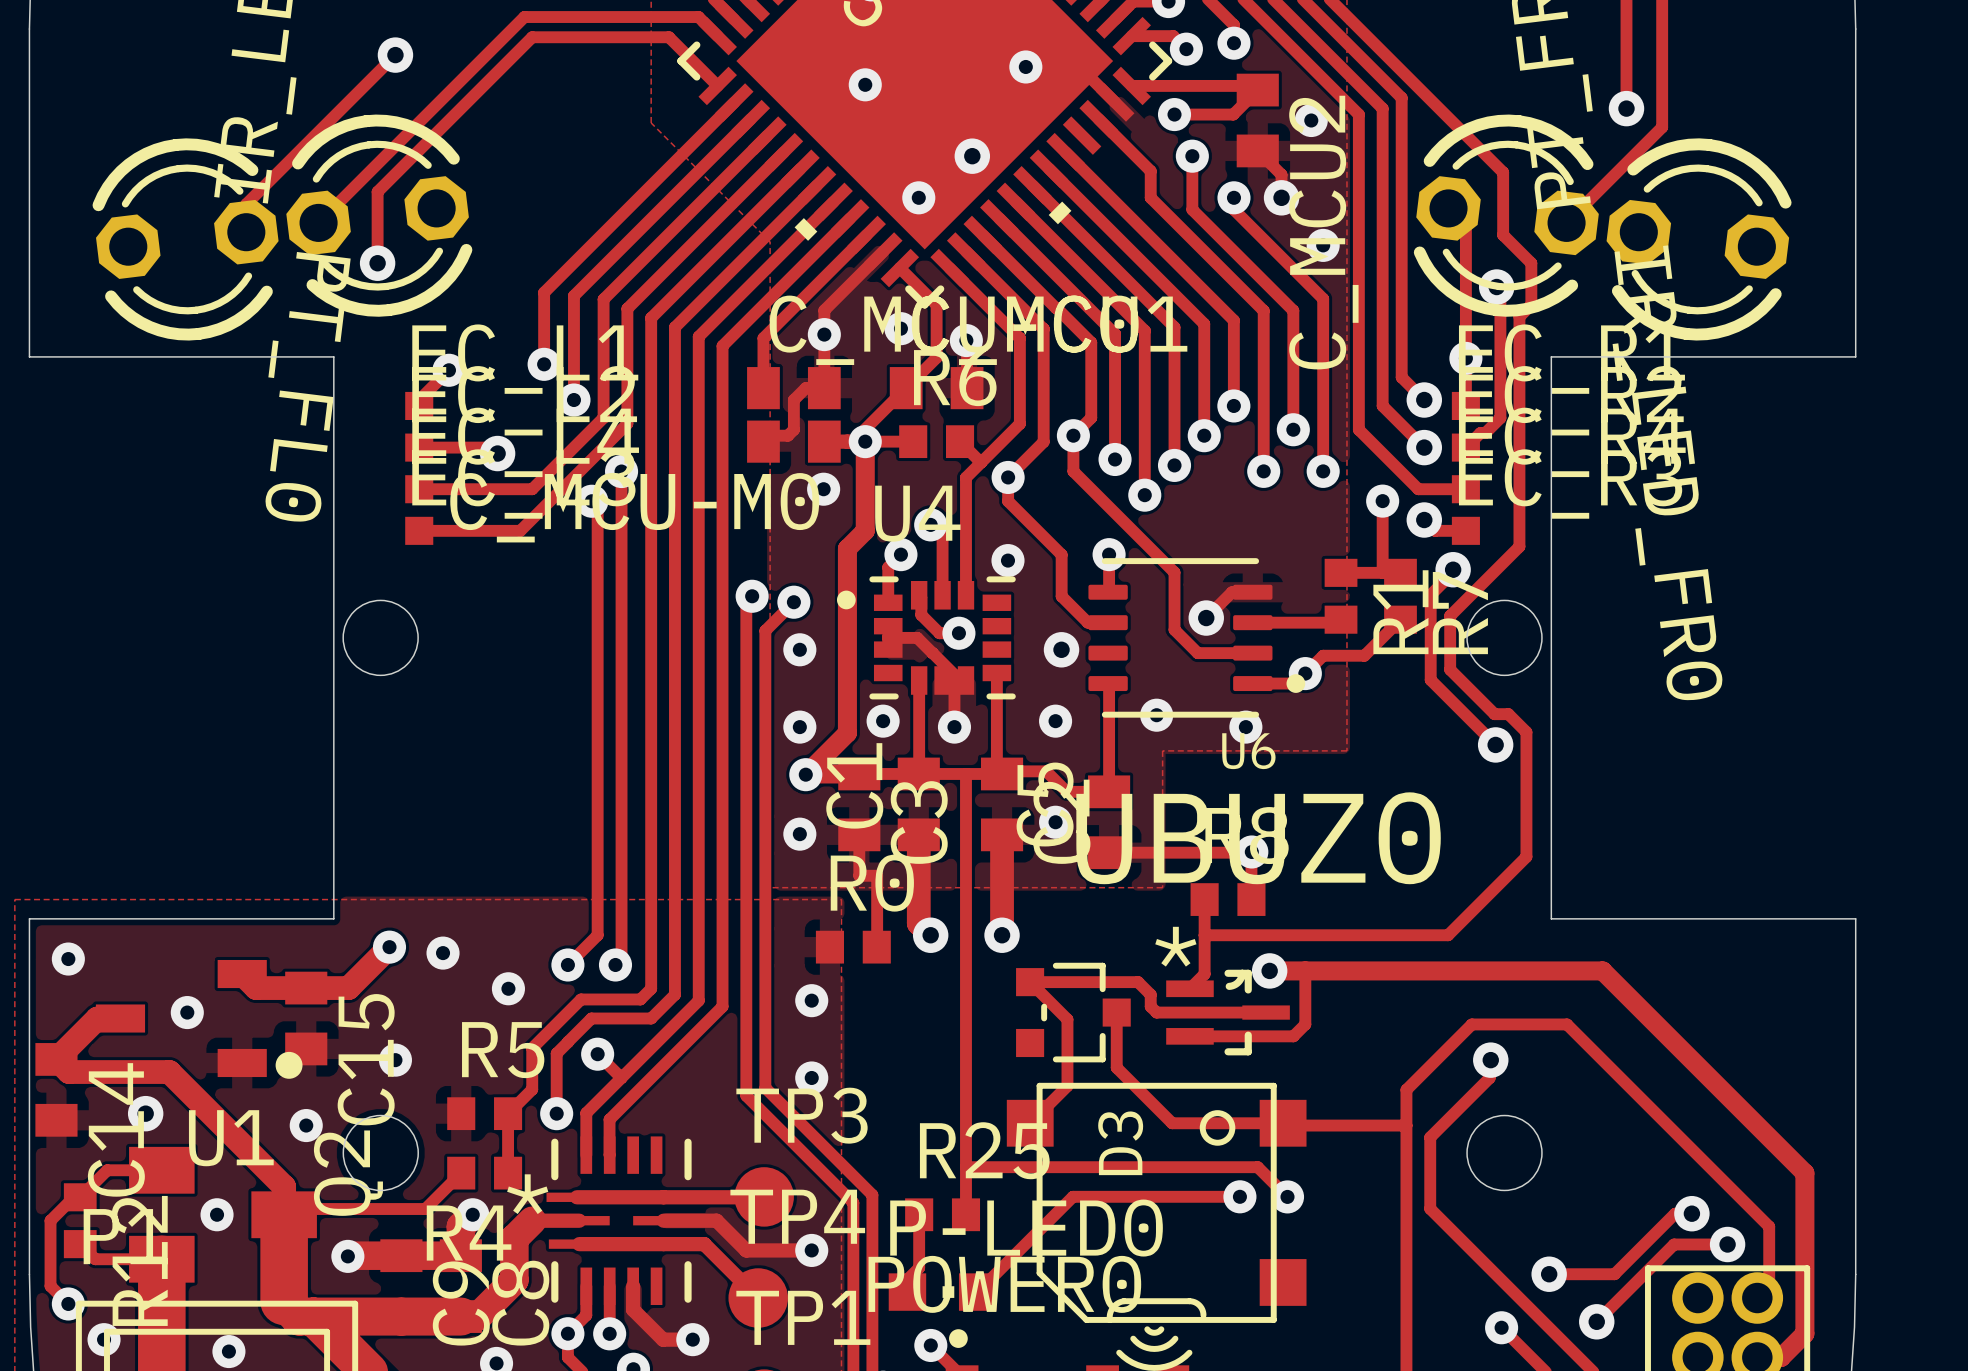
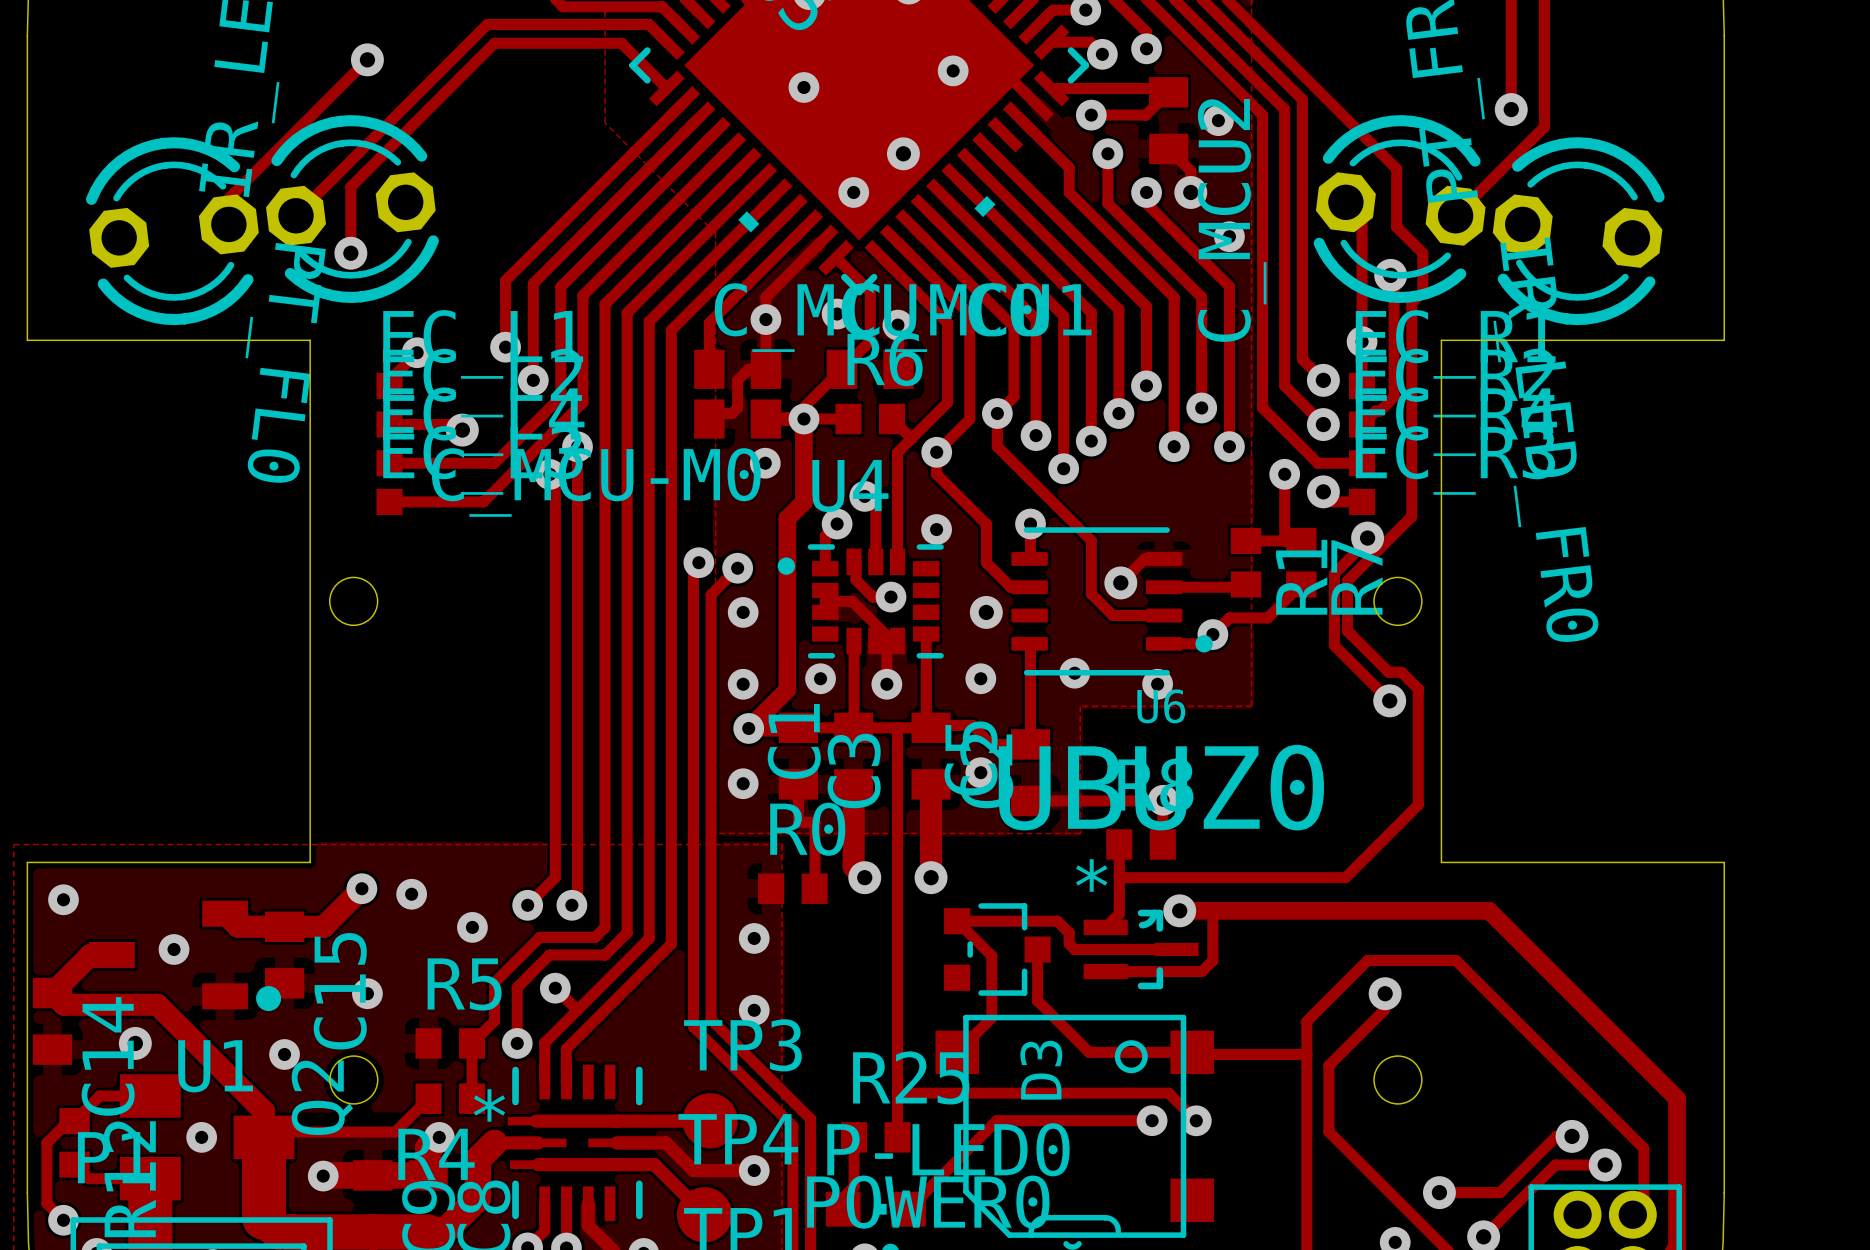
track: (1453, 569) (1453, 572) (1430, 594) (1430, 679) (1436, 685) -> (1367, 538) (1367, 540) (1334, 573) (1334, 645)
via position: (1453, 569) -> (1367, 538)
round board edge size: [343, 600, 419, 676] -> [329, 577, 378, 626]
round board edge size: [1467, 600, 1542, 676] -> [1373, 577, 1422, 626]
round board edge size: [343, 1115, 419, 1191] -> [329, 1056, 378, 1104]
round board edge size: [1467, 1115, 1542, 1191] -> [1373, 1056, 1422, 1104]

